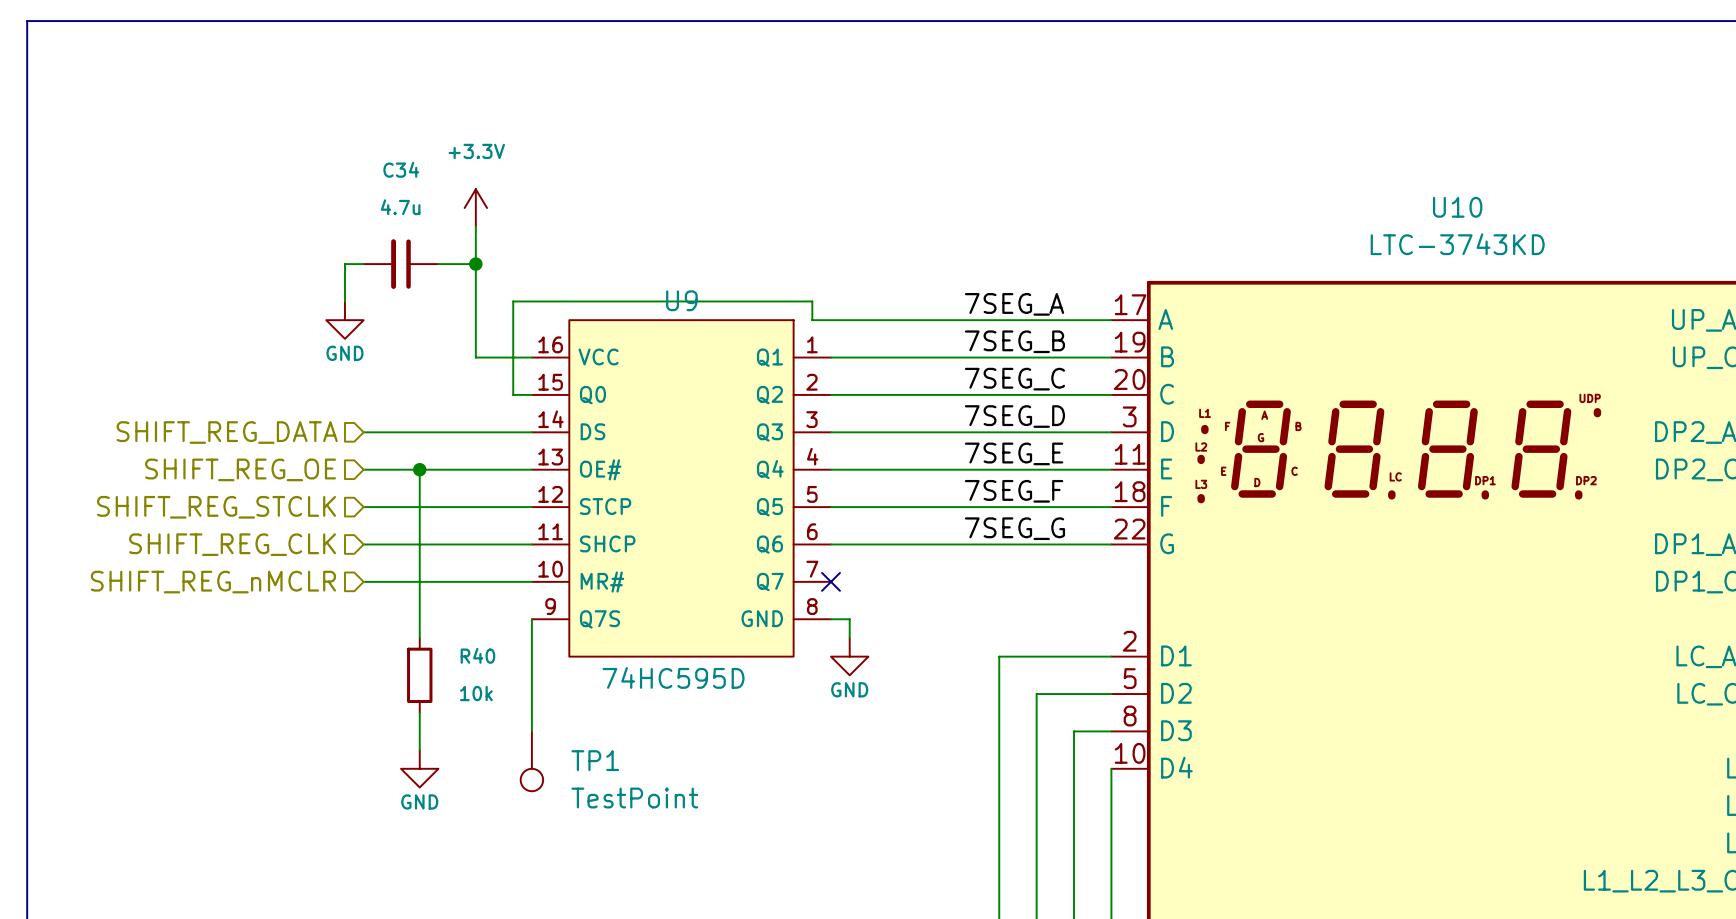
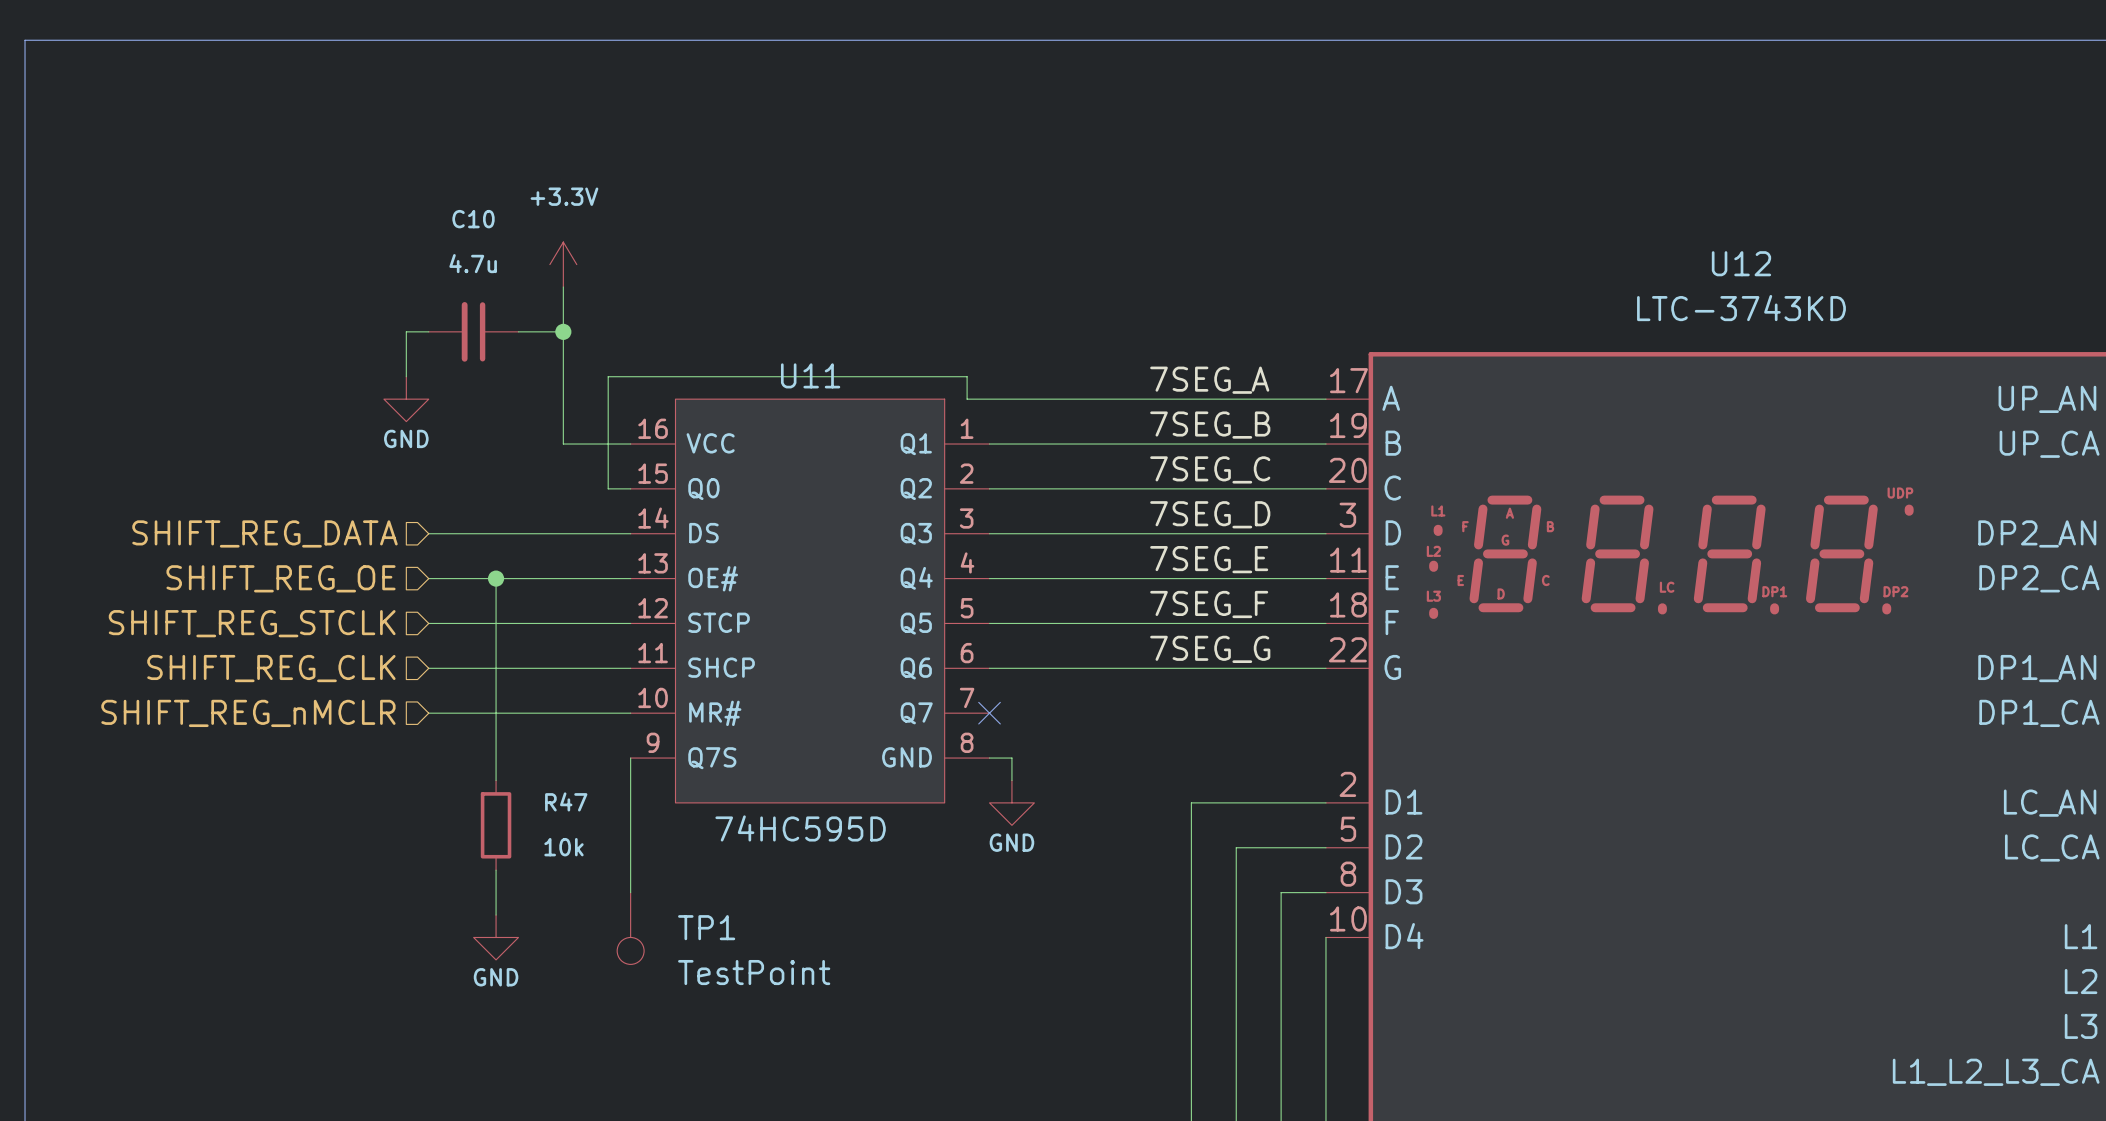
C34 name: C34 (401, 169) -> C10 (473, 219)
U10 name: U10 (1457, 207) -> U12 (1741, 263)
U9 name: U9 (681, 300) -> U11 (810, 375)
R40 name: R40 (477, 655) -> R47 (566, 801)

